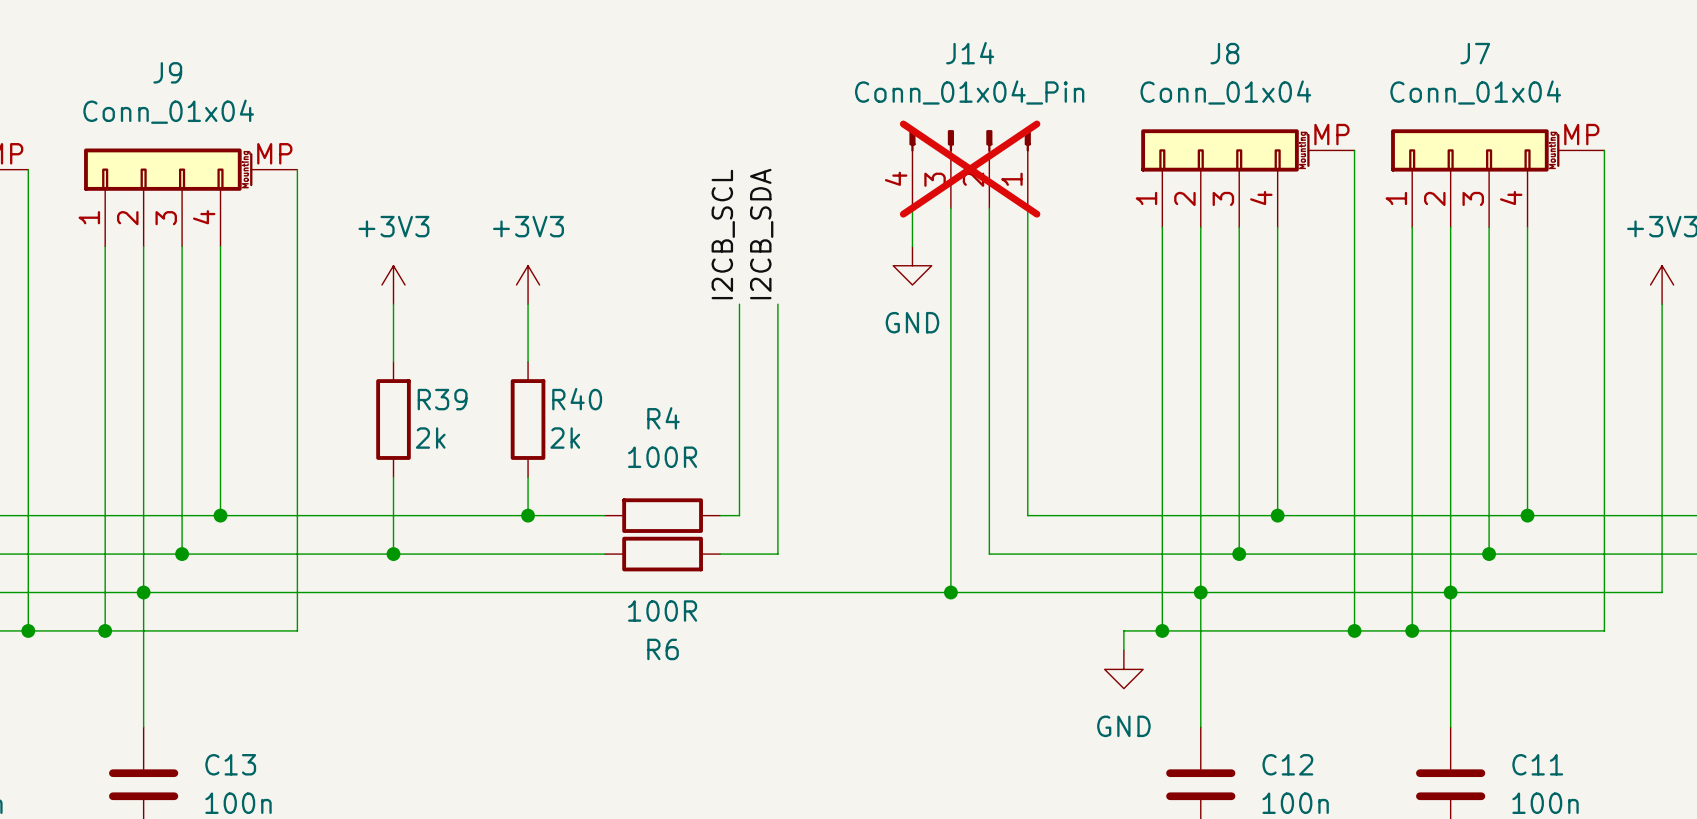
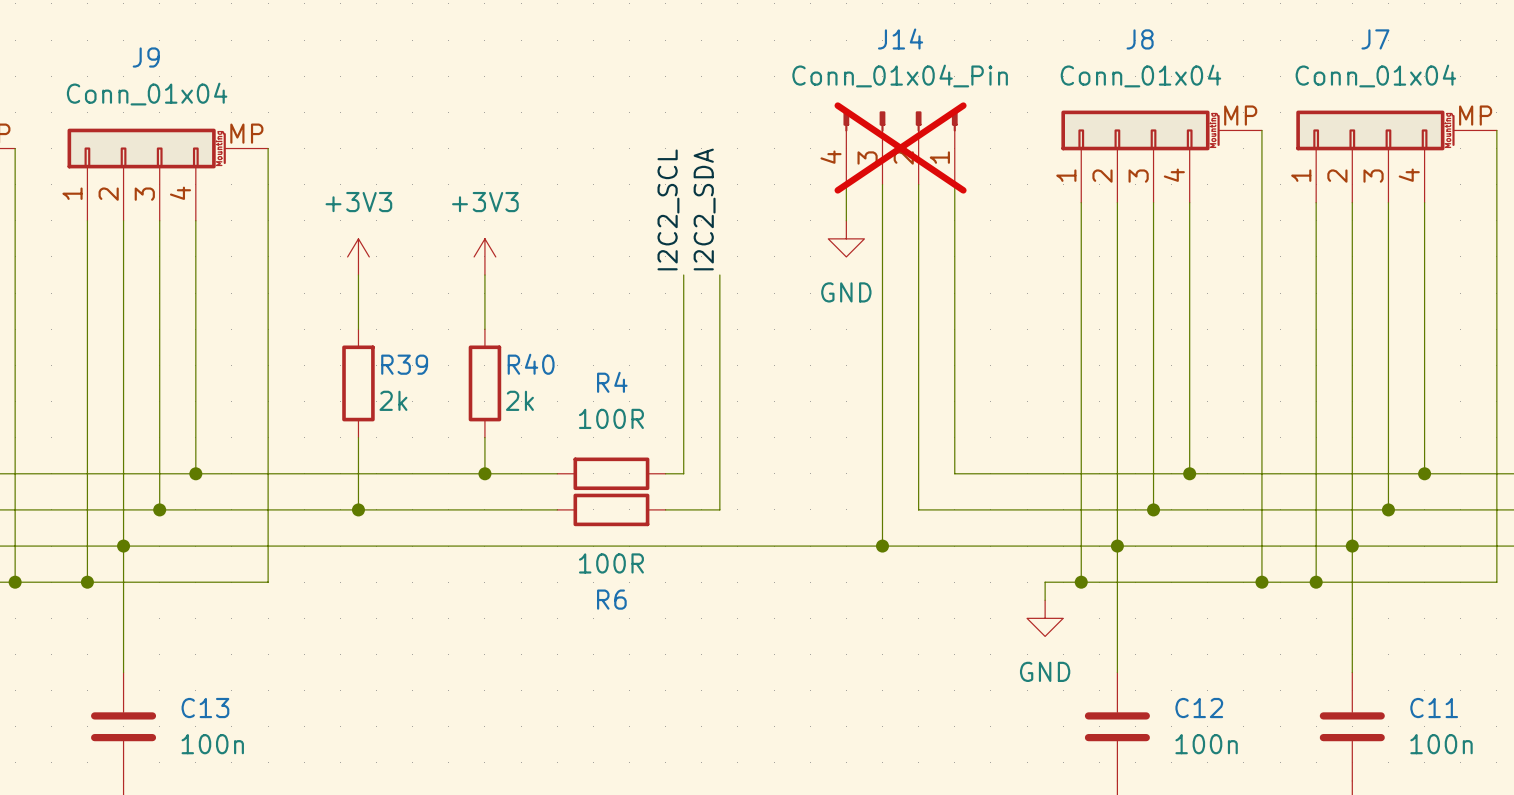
label: I2CB_SCL (723, 234) -> I2C2_SCL (668, 209)
label: I2CB_SDA (761, 234) -> I2C2_SDA (704, 209)

